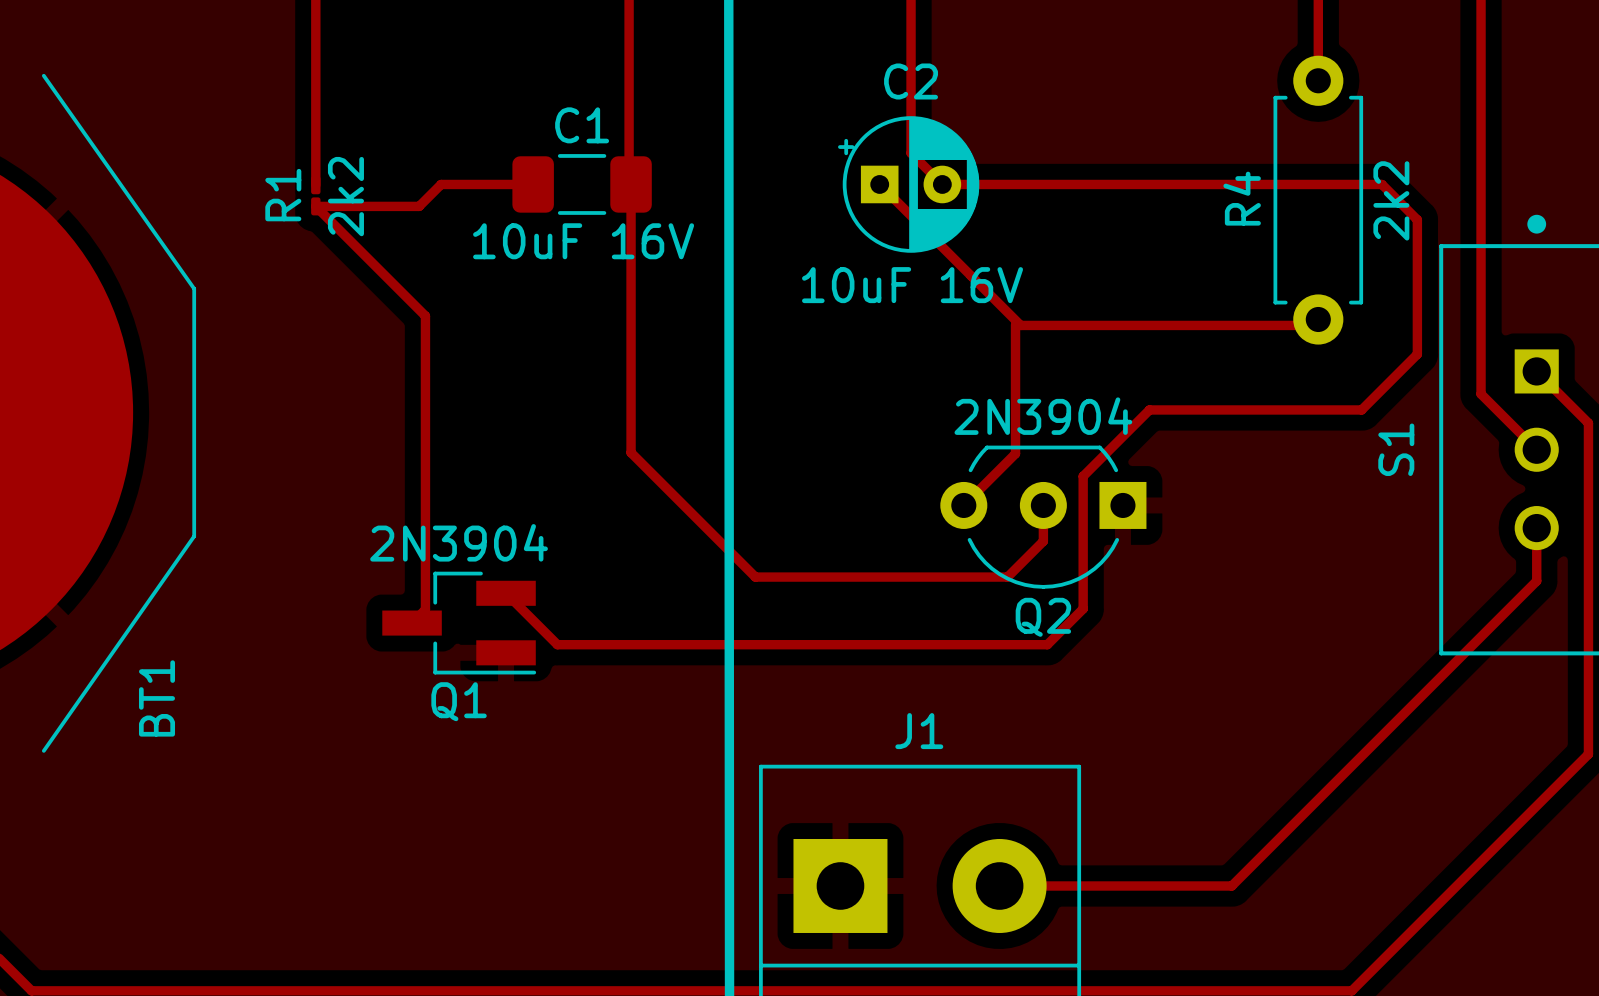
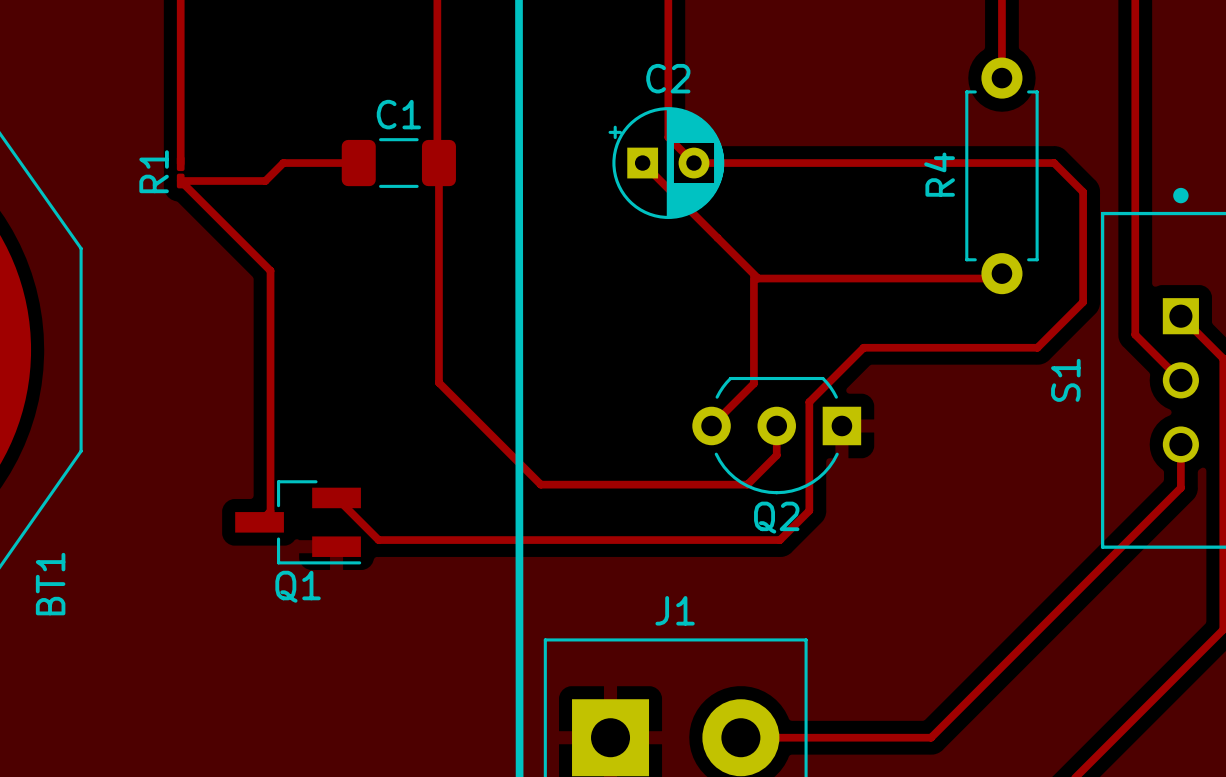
R1 value: 2k2 (345, 196) -> none
R4 value: 2k2 (1391, 200) -> none
C1 value: 10uF 16V (583, 241) -> none
C2 value: 10uF 16V (912, 285) -> none
Q2 value: 2N3904 (1043, 416) -> none
Q1 value: 2N3904 (459, 542) -> none

